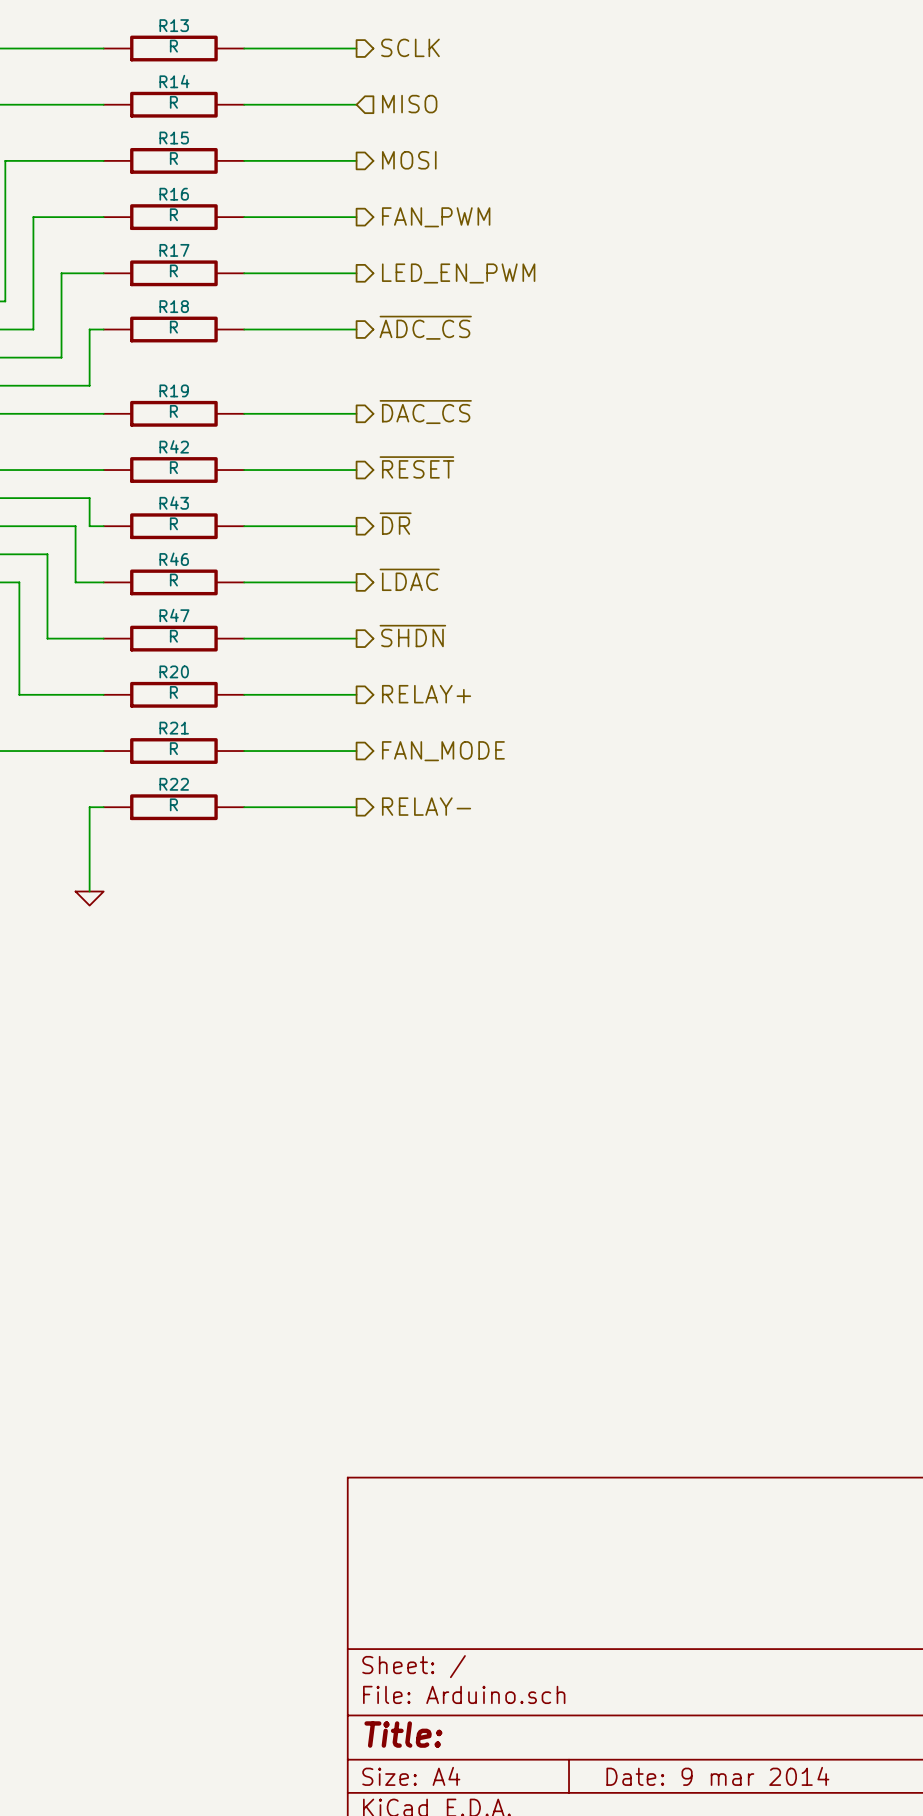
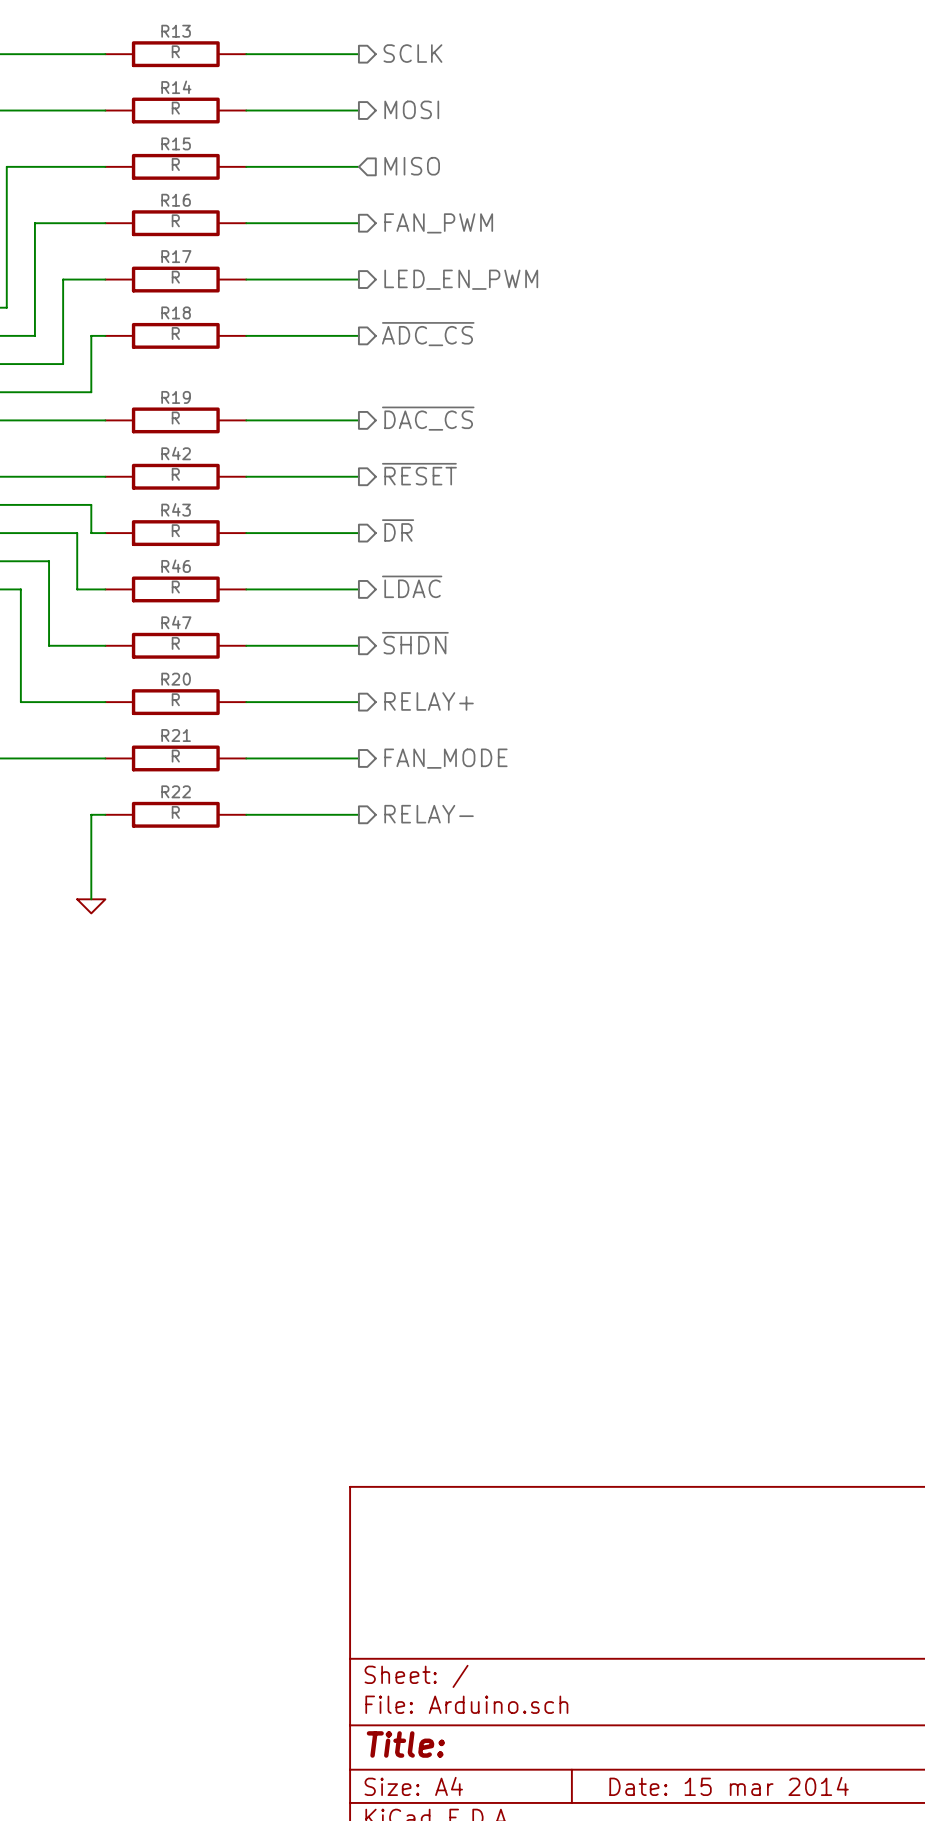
hierarchical label shape: input (409, 104) -> output (411, 109)
hierarchical label: MISO (409, 104) -> MOSI (411, 109)
hierarchical label shape: output (409, 160) -> input (412, 166)
hierarchical label: MOSI (409, 160) -> MISO (412, 166)
title block: Date: 9 mar 2014 (717, 1776) -> Date: 15 mar 2014 (729, 1786)

